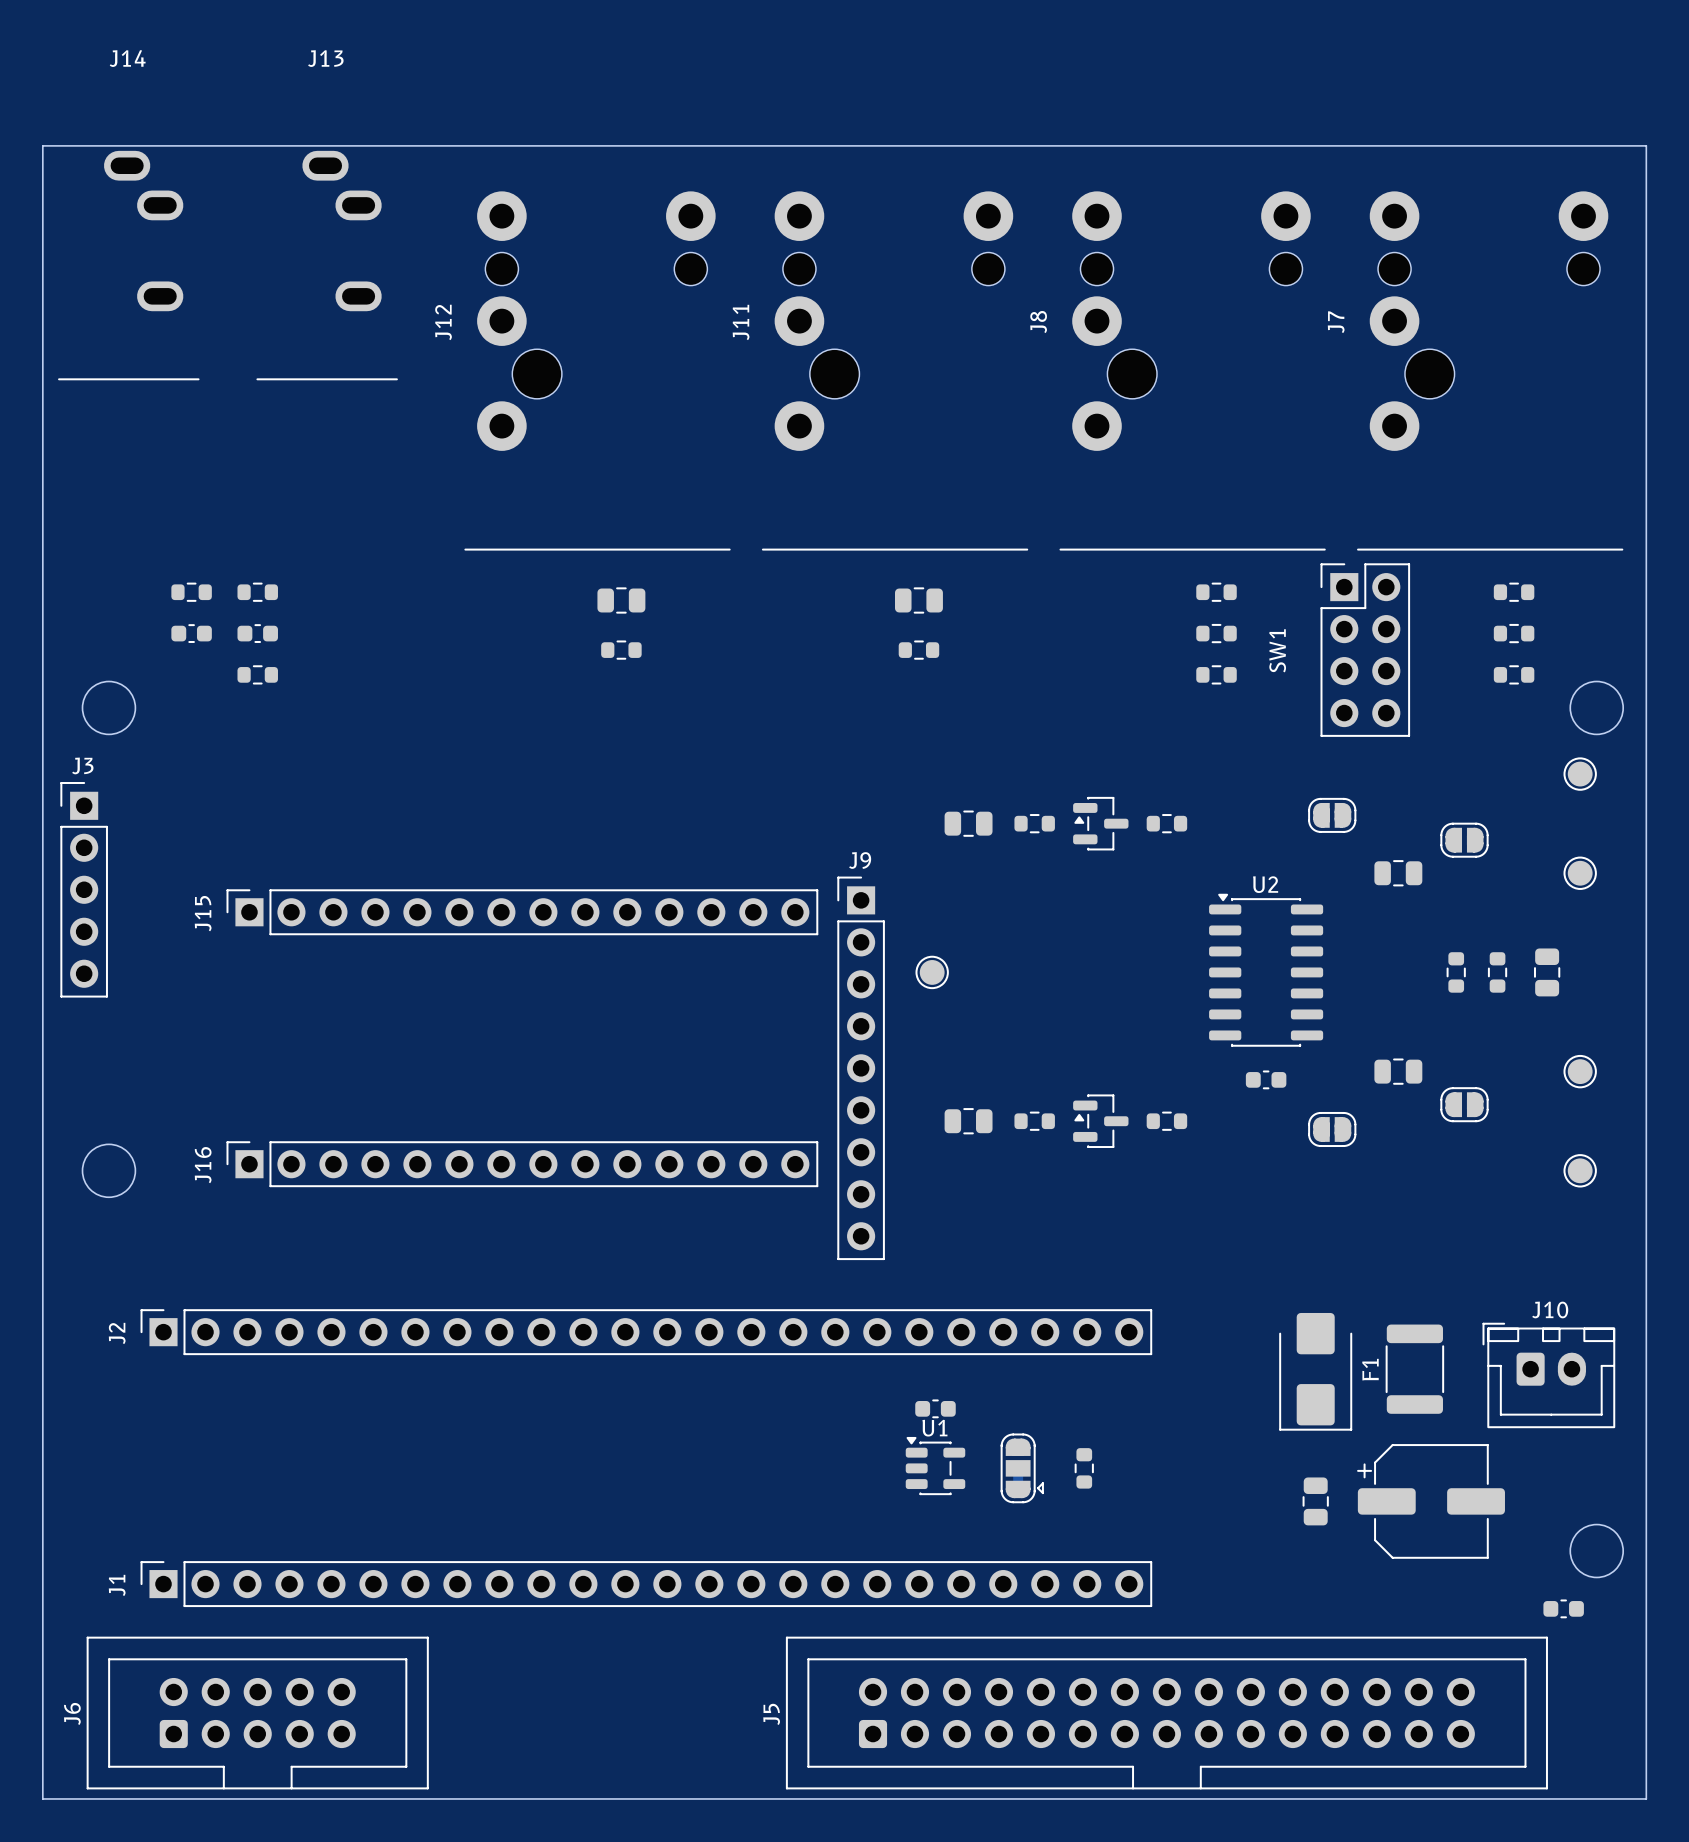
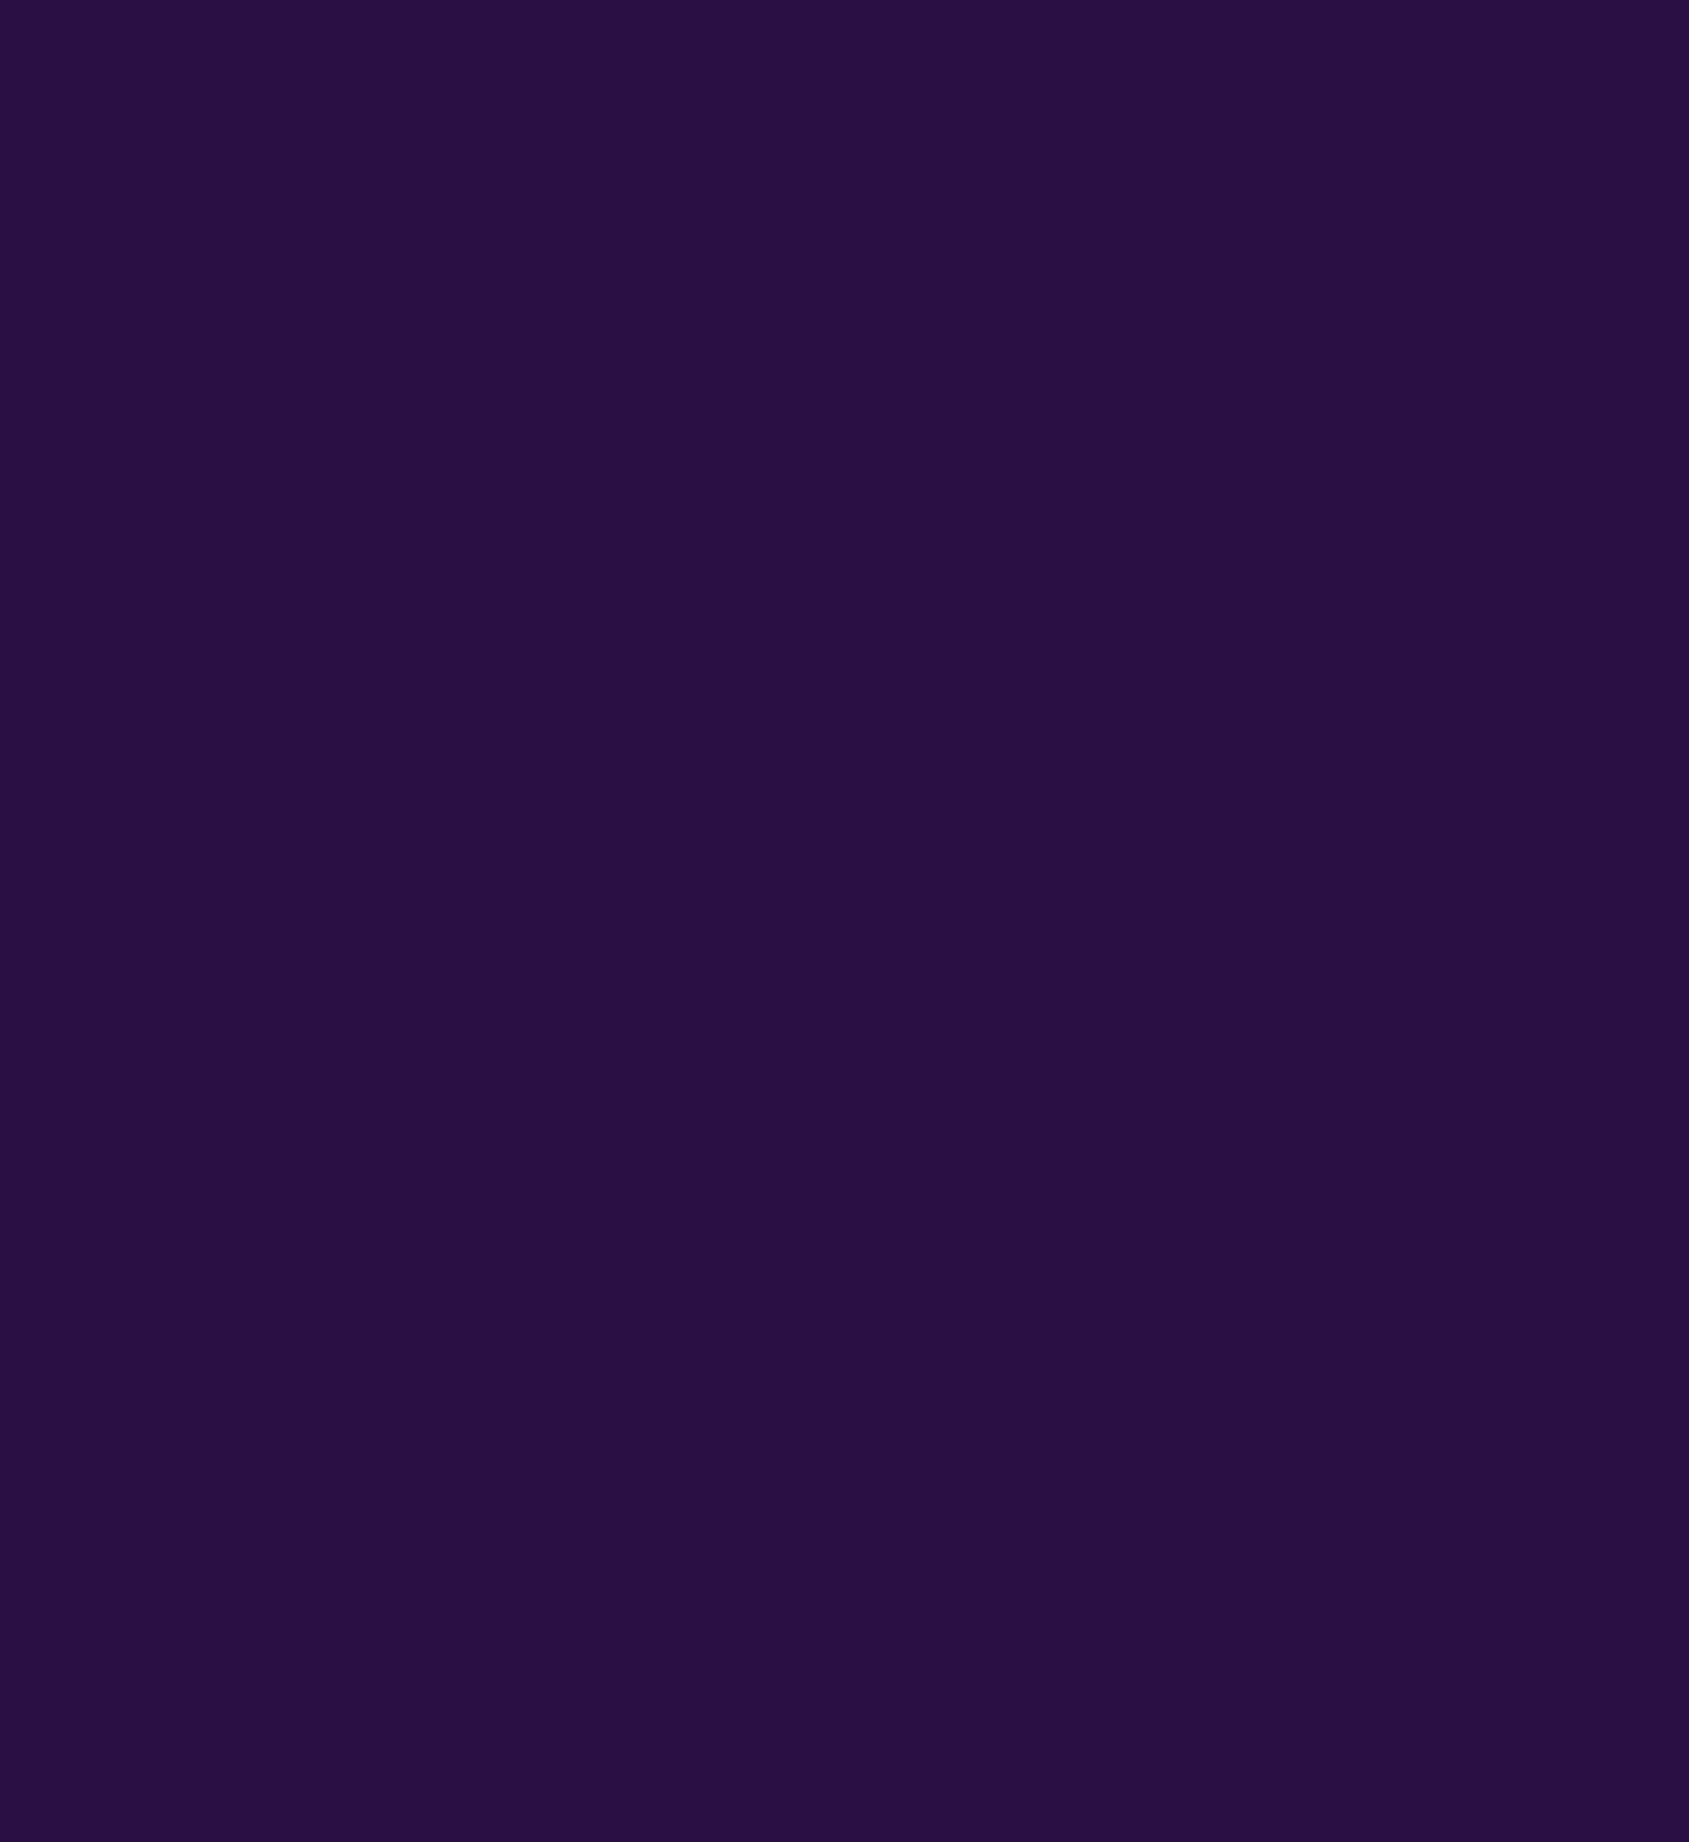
board edge: (42, 145) (42, 1798) (1646, 1798) (1646, 145) (42, 145) -> none
J14: (128, 265) -> none
J13: (327, 265) -> none
J12: (597, 370) -> none
J11: (895, 370) -> none
J8: (1192, 370) -> none
J7: (1490, 370) -> none
part: (191, 592) -> none
part: (257, 592) -> none
part: (1216, 592) -> none
part: (1514, 592) -> none
part: (621, 600) -> none
part: (918, 600) -> none
part: (191, 633) -> none
part: (257, 633) -> none
part: (1216, 633) -> none
part: (1514, 633) -> none
part: (621, 650) -> none
part: (918, 650) -> none
SW1: (1365, 650) -> none
part: (257, 674) -> none
part: (1216, 674) -> none
part: (1514, 674) -> none
round board edge: [81, 680, 137, 736] -> none
round board edge: [1569, 680, 1625, 736] -> none
part: (1580, 774) -> none
part: (1332, 815) -> none
part: (968, 823) -> none
part: (1034, 823) -> none
part: (1100, 823) -> none
part: (1166, 823) -> none
part: (1464, 840) -> none
part: (1398, 873) -> none
part: (1580, 873) -> none
J3: (84, 889) -> none
J15: (522, 912) -> none
U2: (1266, 970) -> none
part: (932, 972) -> none
part: (1456, 972) -> none
part: (1497, 972) -> none
part: (1547, 972) -> none
J9: (861, 1068) -> none
part: (1398, 1071) -> none
part: (1580, 1071) -> none
part: (1266, 1079) -> none
part: (1464, 1104) -> none
part: (968, 1121) -> none
part: (1034, 1121) -> none
part: (1100, 1121) -> none
part: (1166, 1121) -> none
part: (1332, 1129) -> none
round board edge: [81, 1143, 137, 1199] -> none
J16: (522, 1164) -> none
part: (1580, 1170) -> none
J2: (646, 1332) -> none
F1: (1414, 1369) -> none
part: (1315, 1371) -> none
J10: (1548, 1375) -> none
part: (935, 1408) -> none
U1: (935, 1466) -> none
part: (1022, 1468) -> none
part: (1084, 1468) -> none
part: (1315, 1501) -> none
part: (1431, 1501) -> none
round board edge: [1569, 1523, 1625, 1579] -> none
J1: (646, 1584) -> none
part: (1563, 1608) -> none
J6: (257, 1713) -> none
J5: (1166, 1713) -> none

